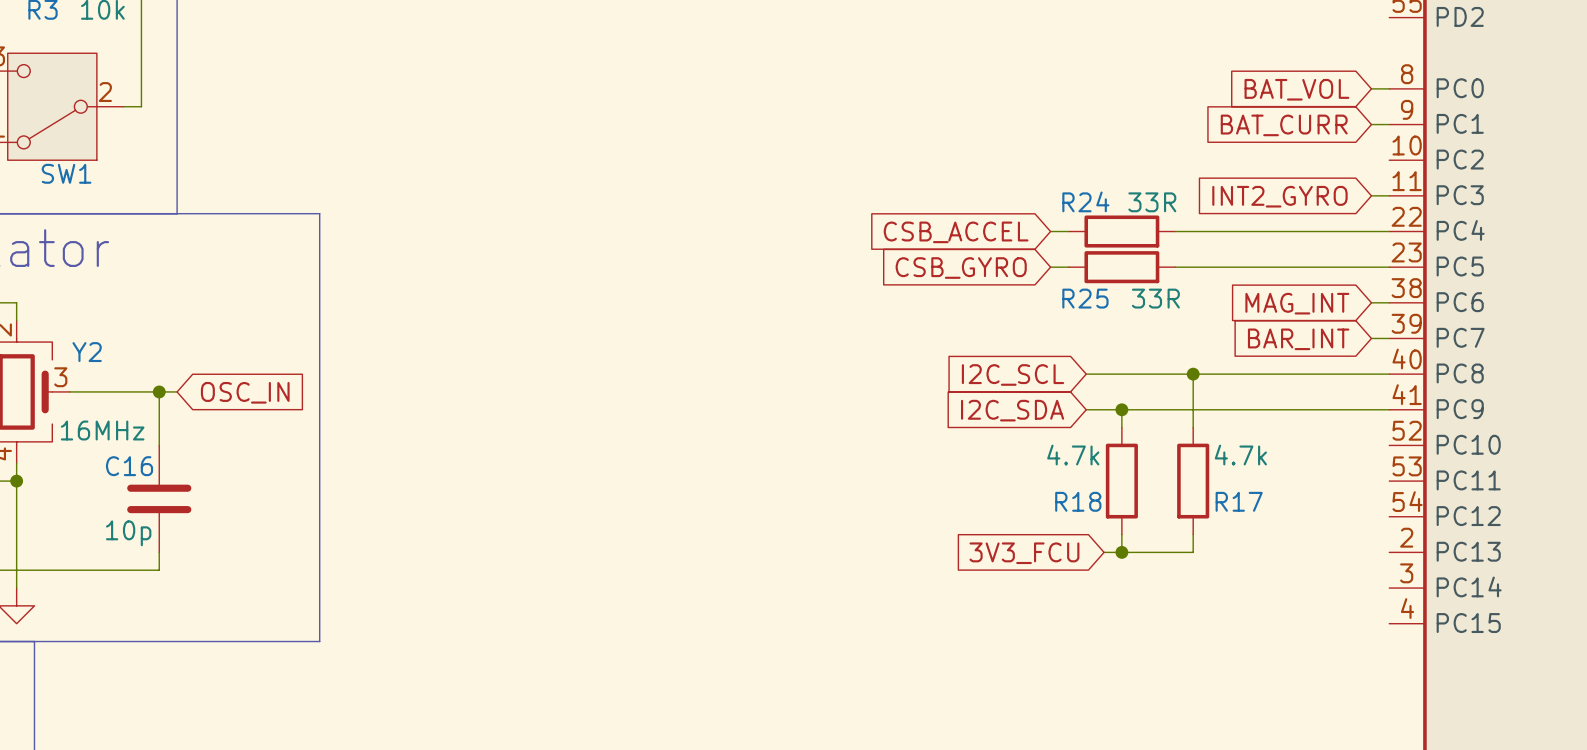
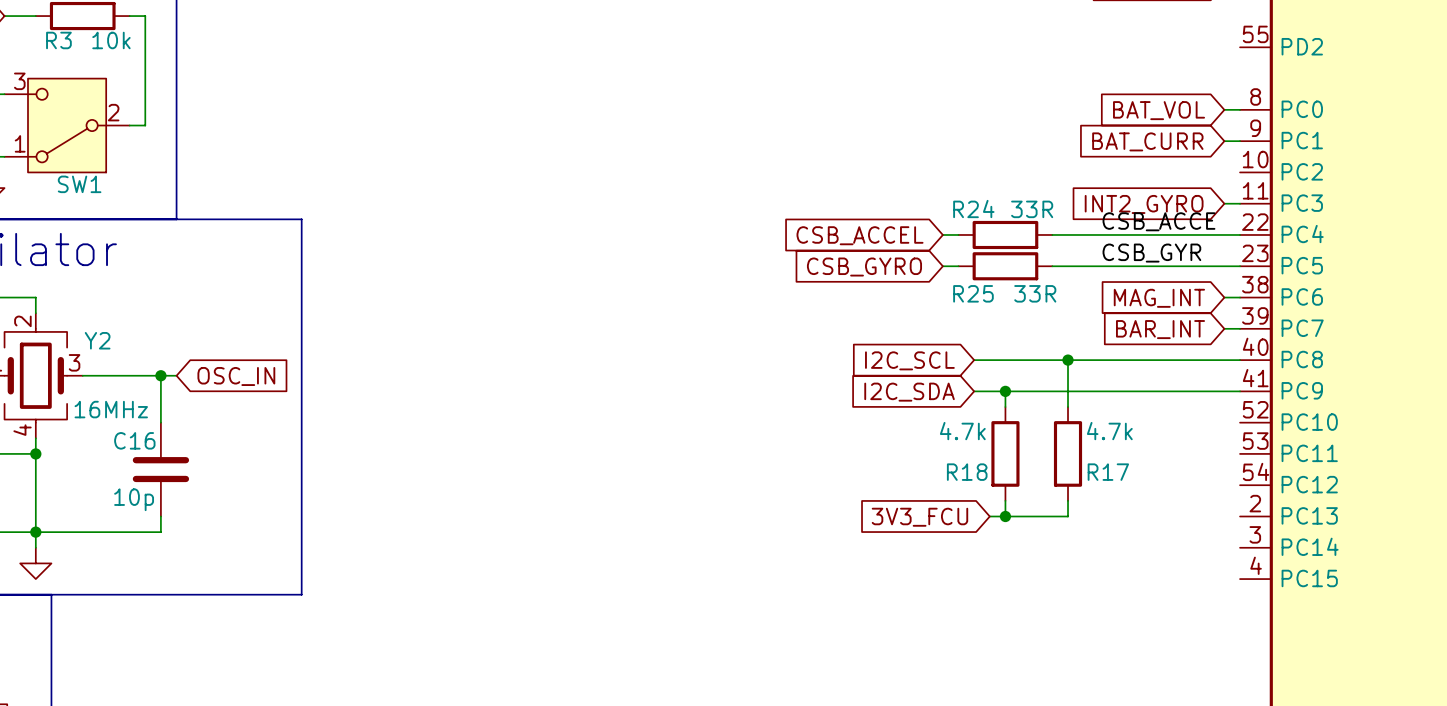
label: none -> CSB_ACCE (1158, 221)
label: none -> CSB_GYR (1151, 253)
junction: none -> (35, 532)

